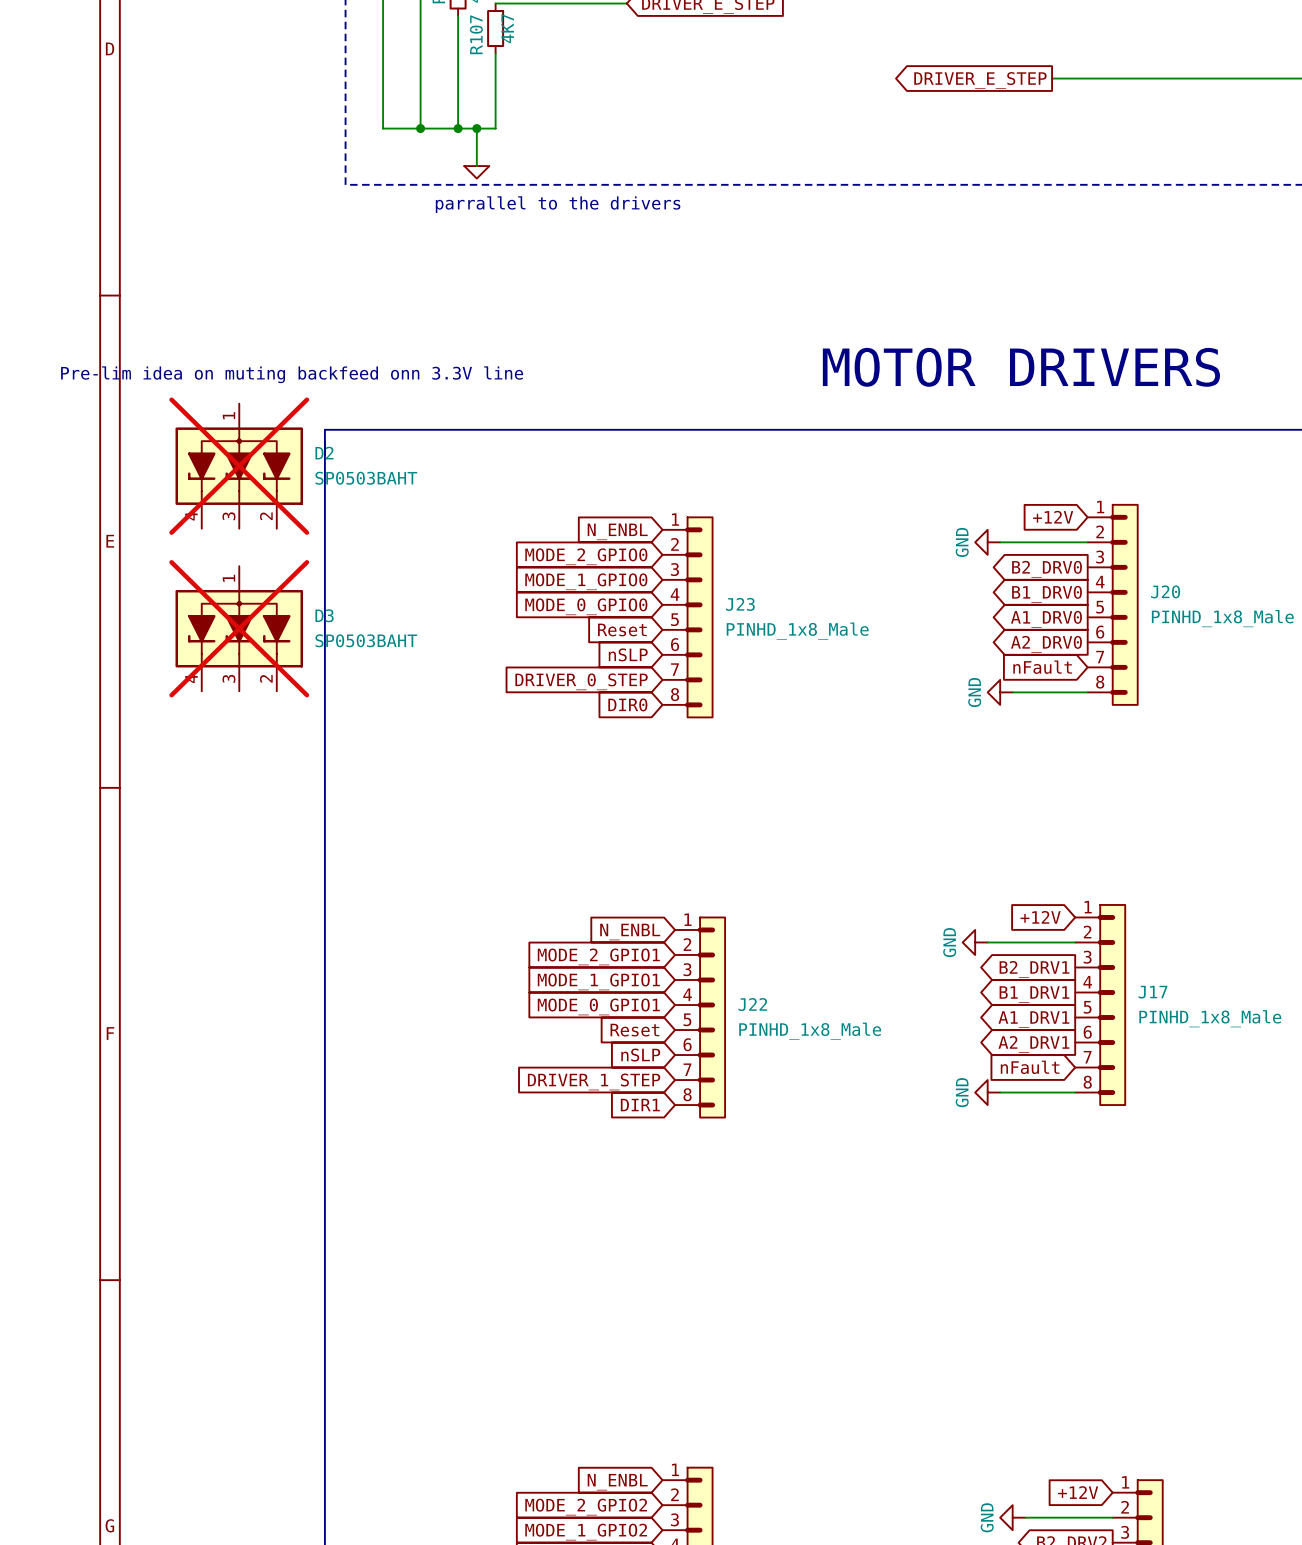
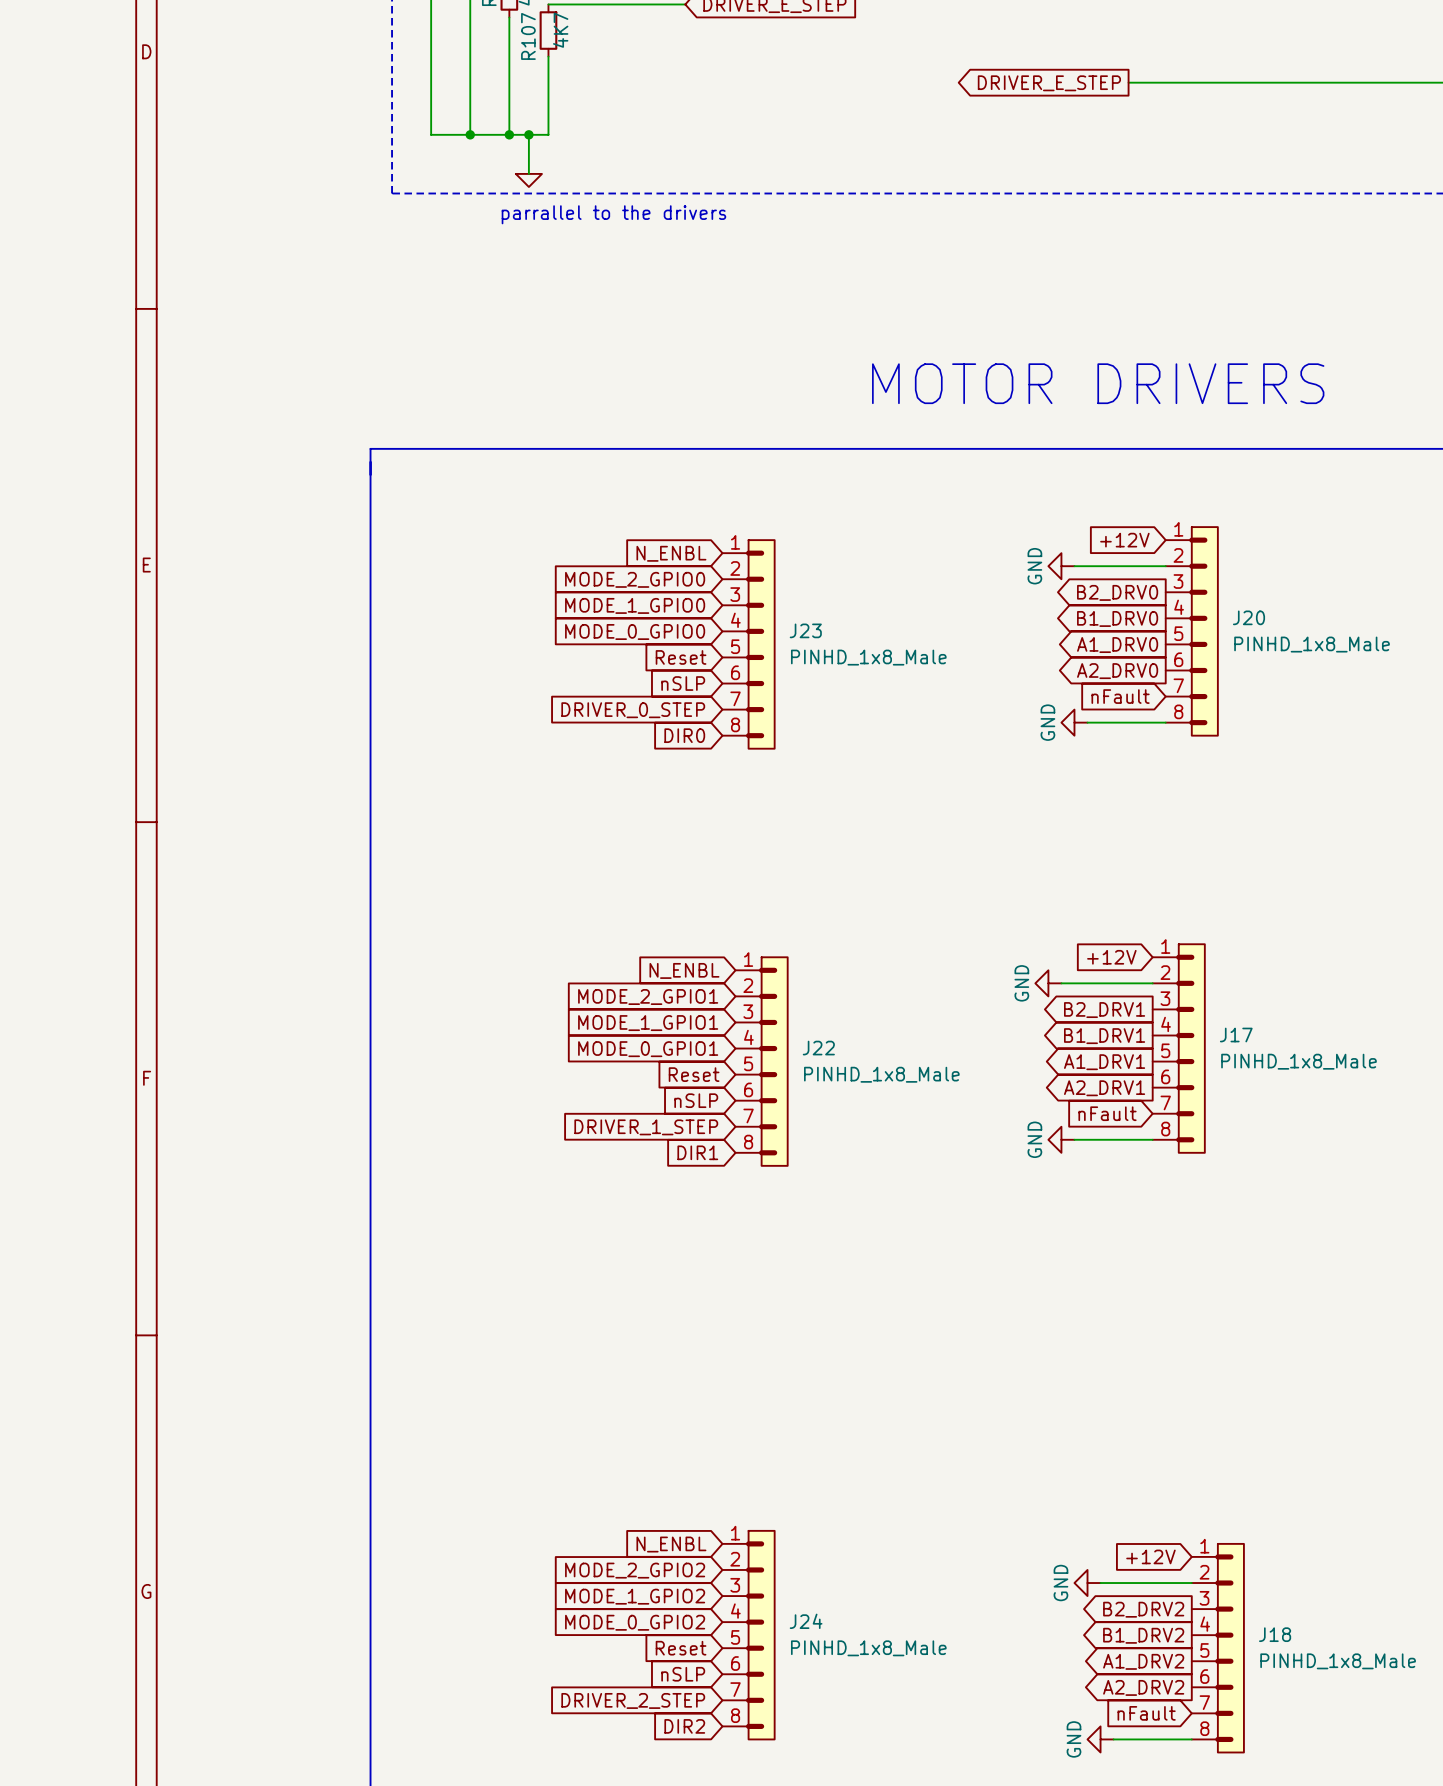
text: Pre-lim idea on muting backfeed onn 3.3V line (292, 374) -> none
D2: SP0503BAHT (239, 466) -> none
D3: SP0503BAHT (239, 628) -> none

